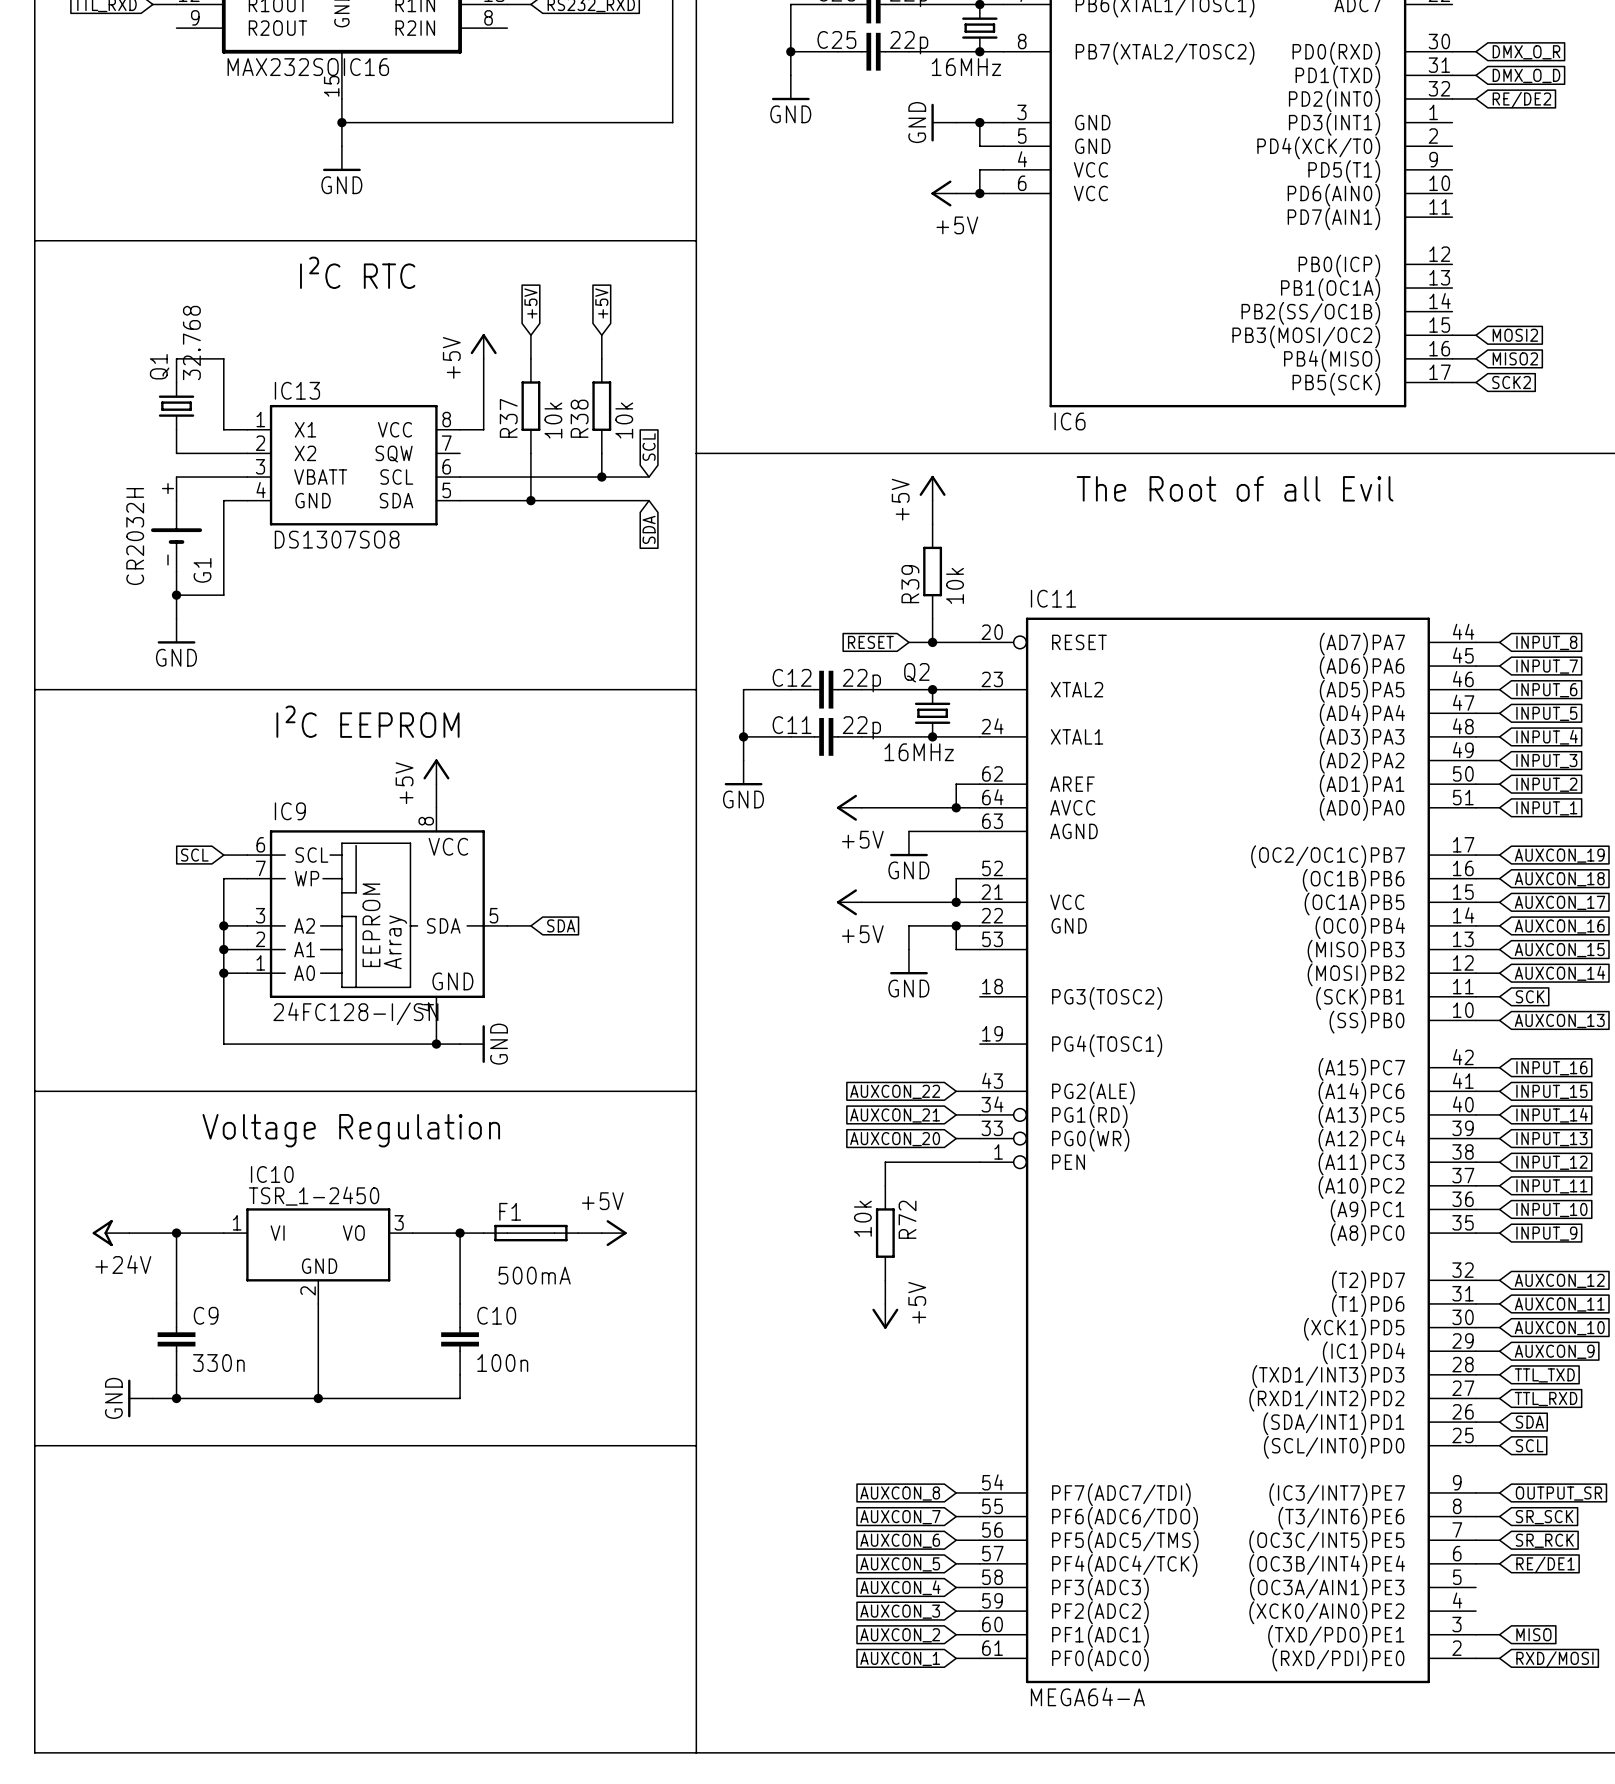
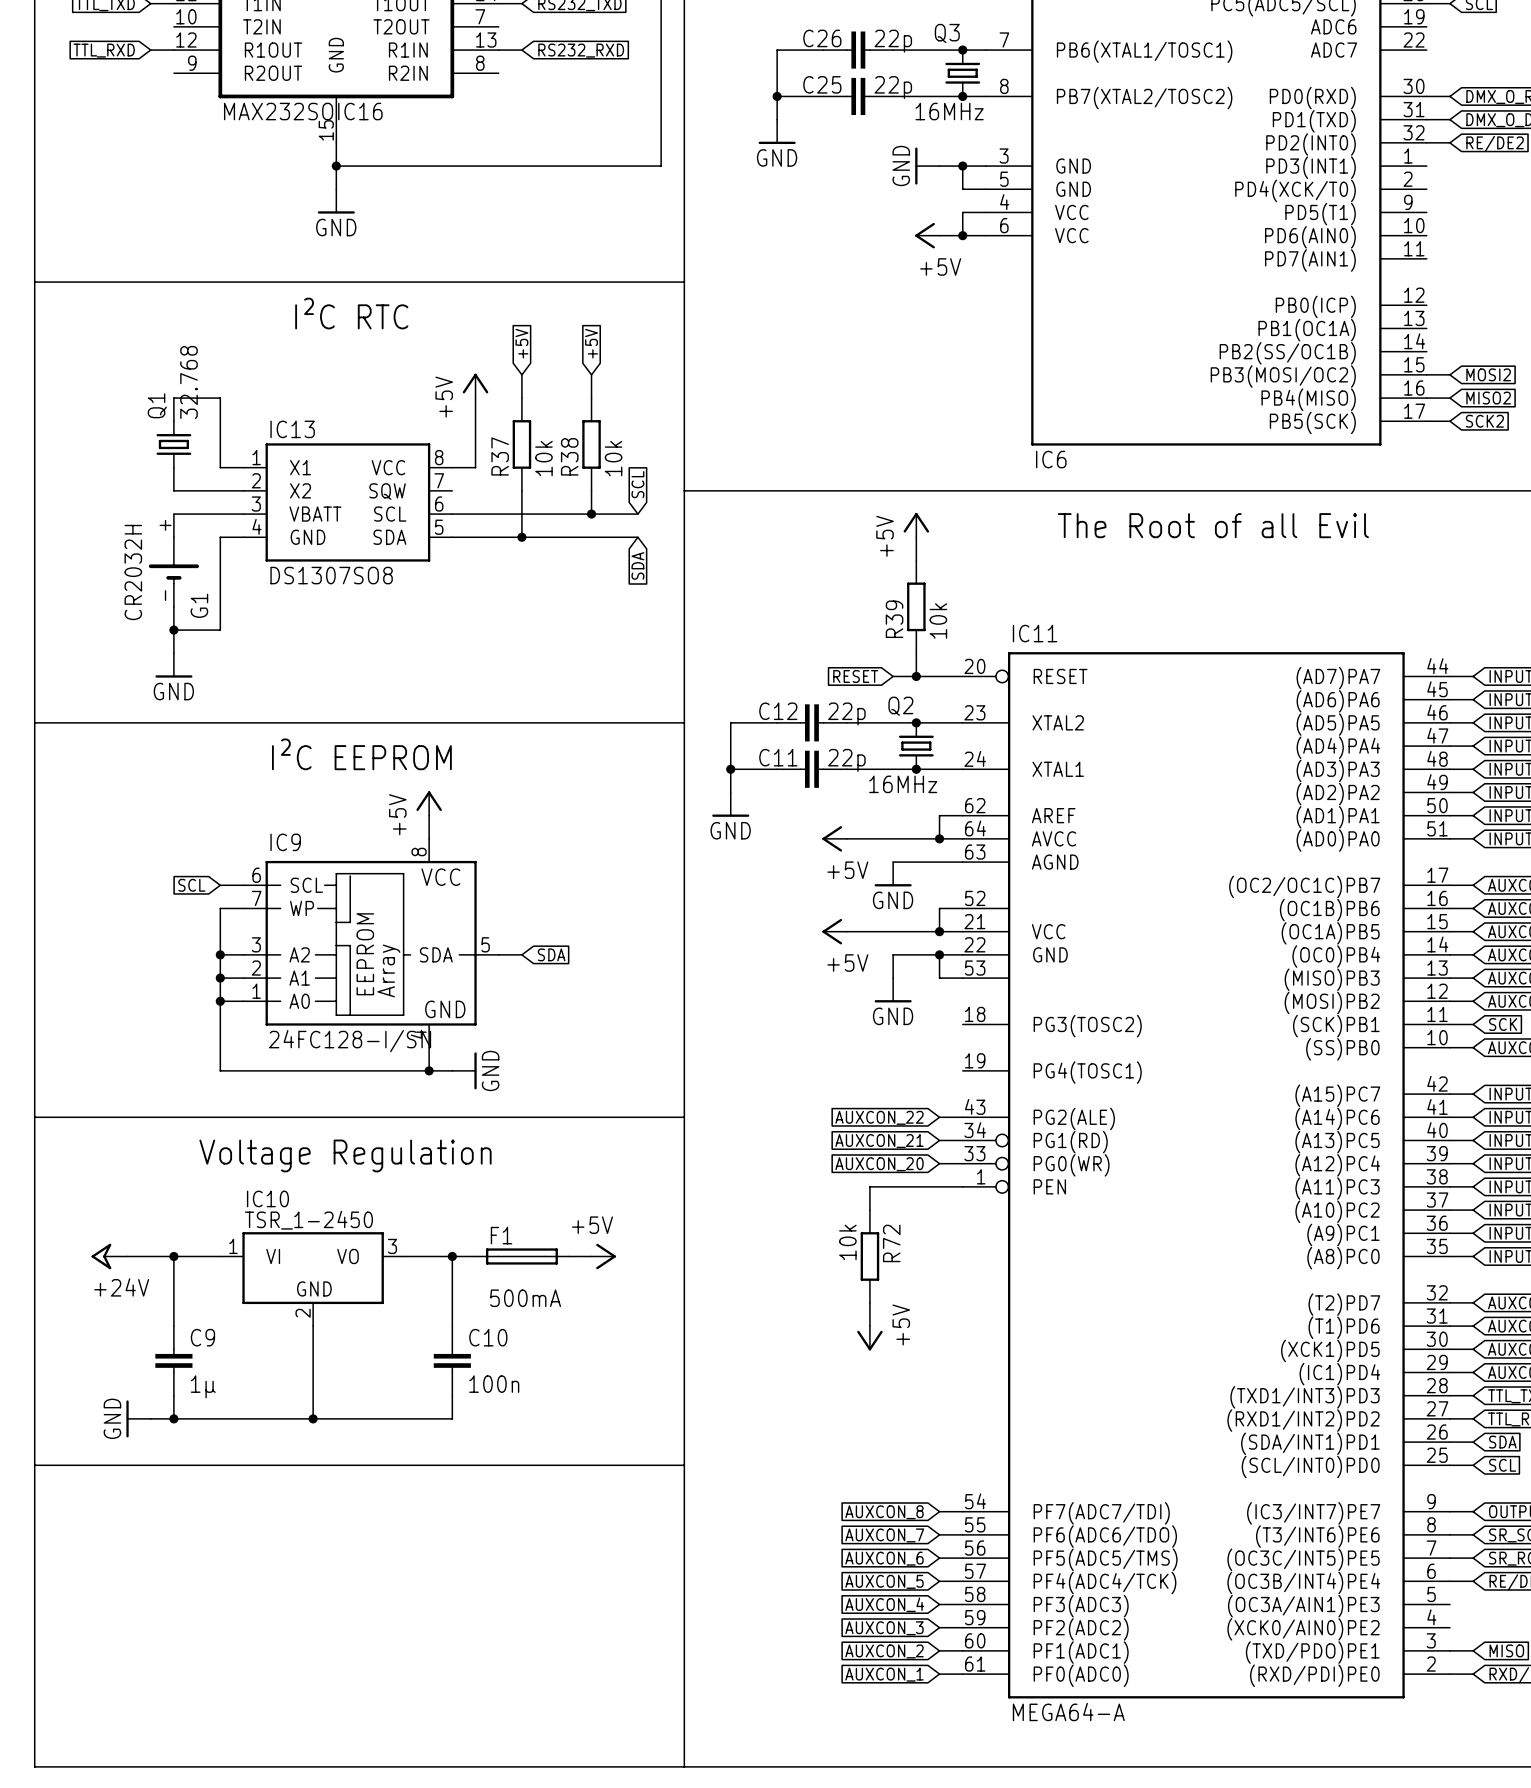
C9 value: 330n (218, 1363) -> 1µ (203, 1386)

